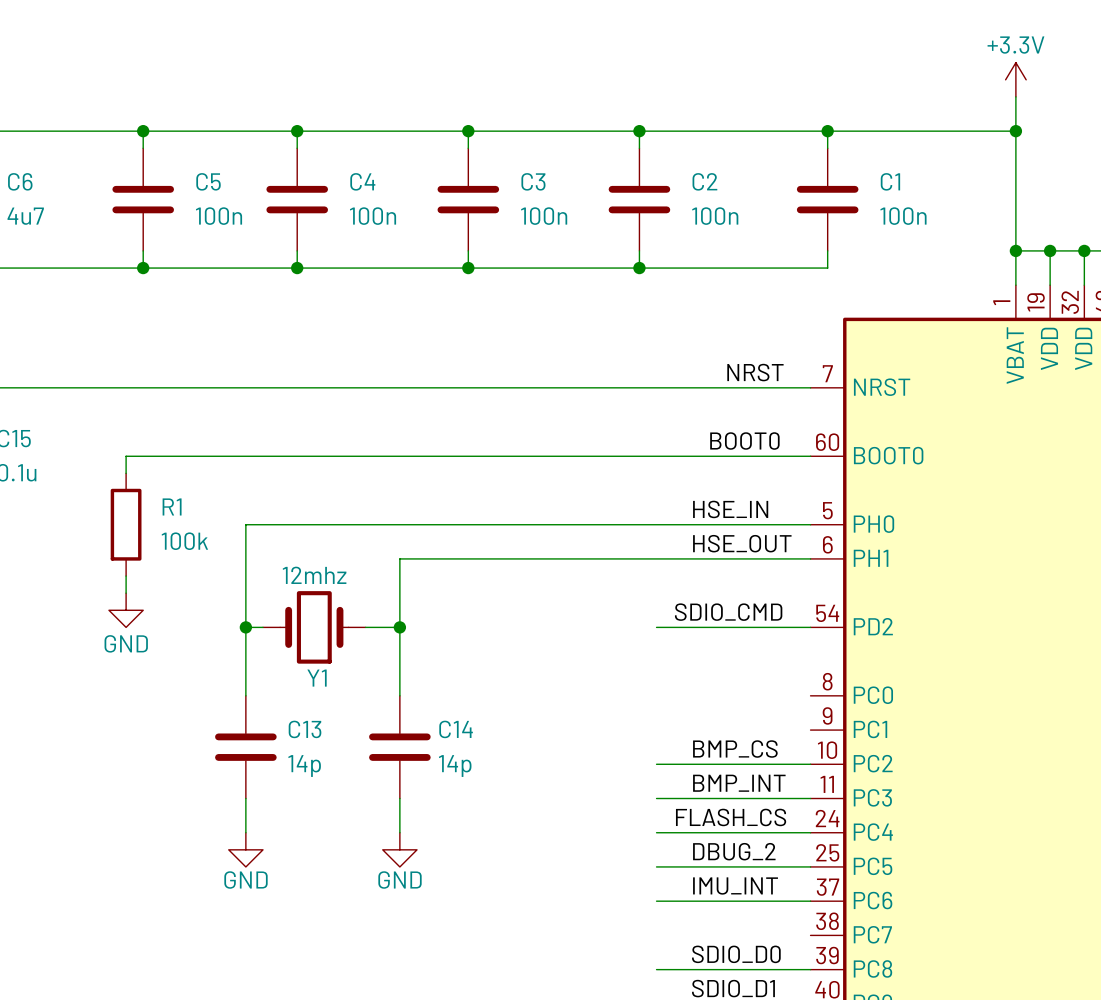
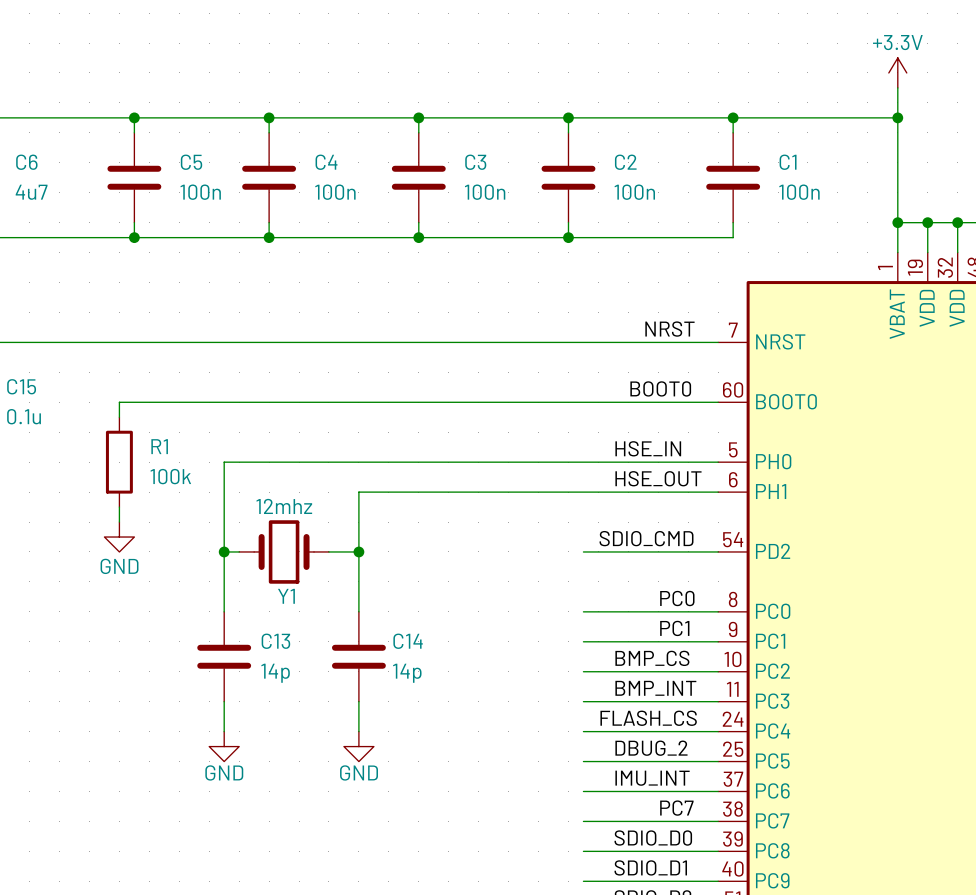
label: none -> PC0 (677, 598)
wire: none -> (583, 611) (718, 611)
label: none -> PC1 (674, 628)
wire: none -> (583, 641) (718, 641)
label: none -> PC7 (676, 808)
wire: none -> (583, 821) (718, 821)

